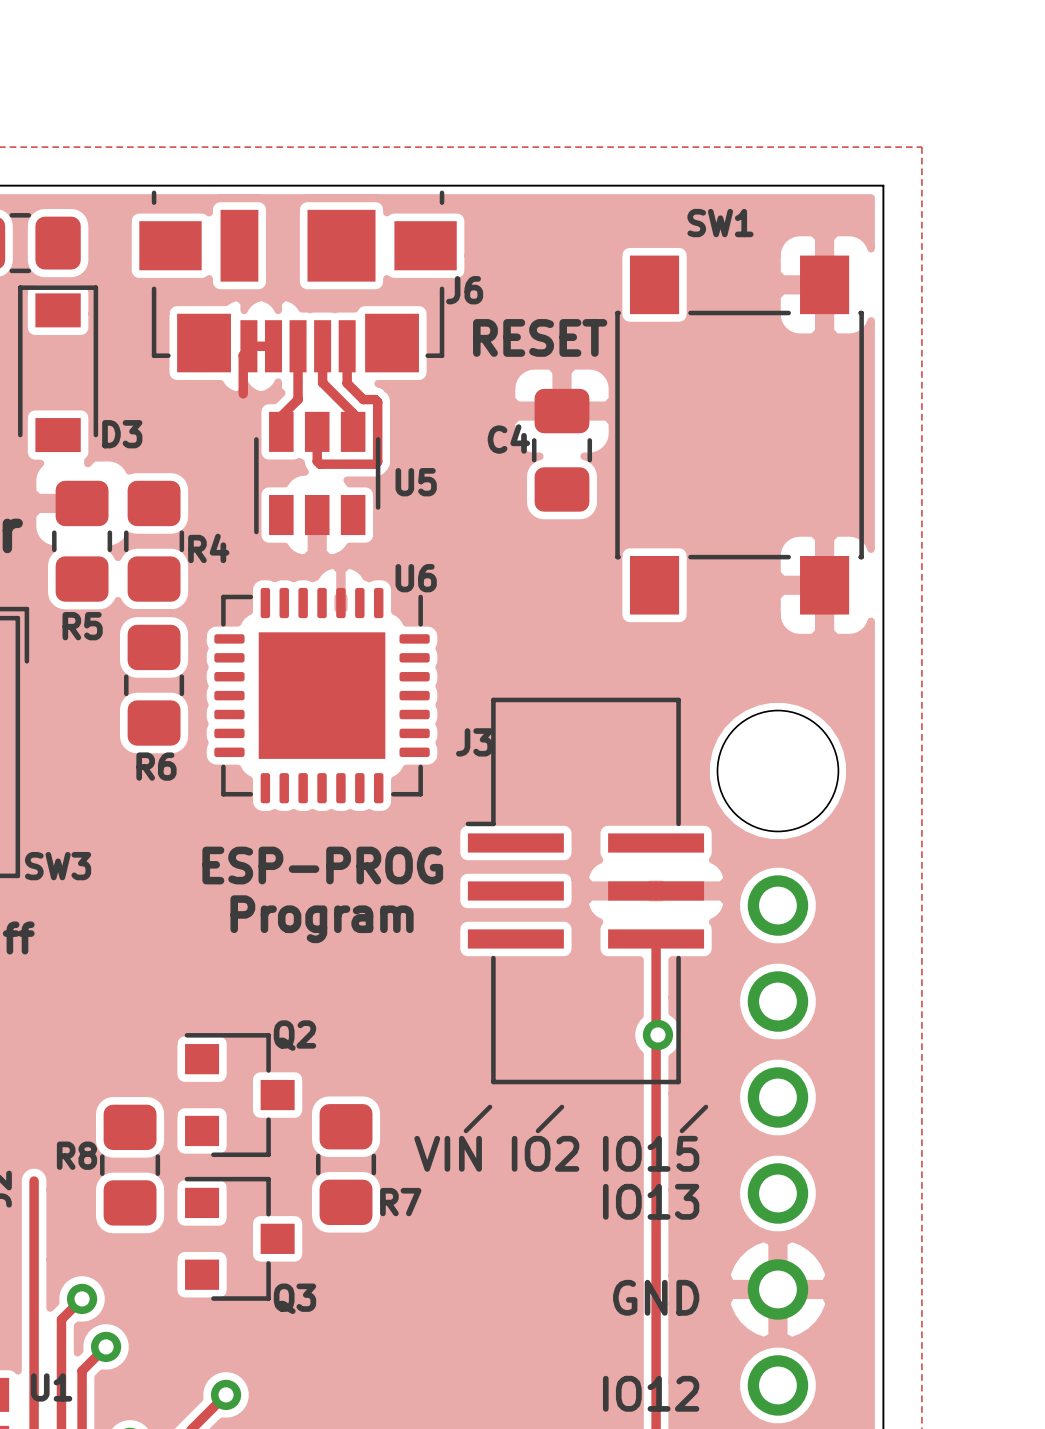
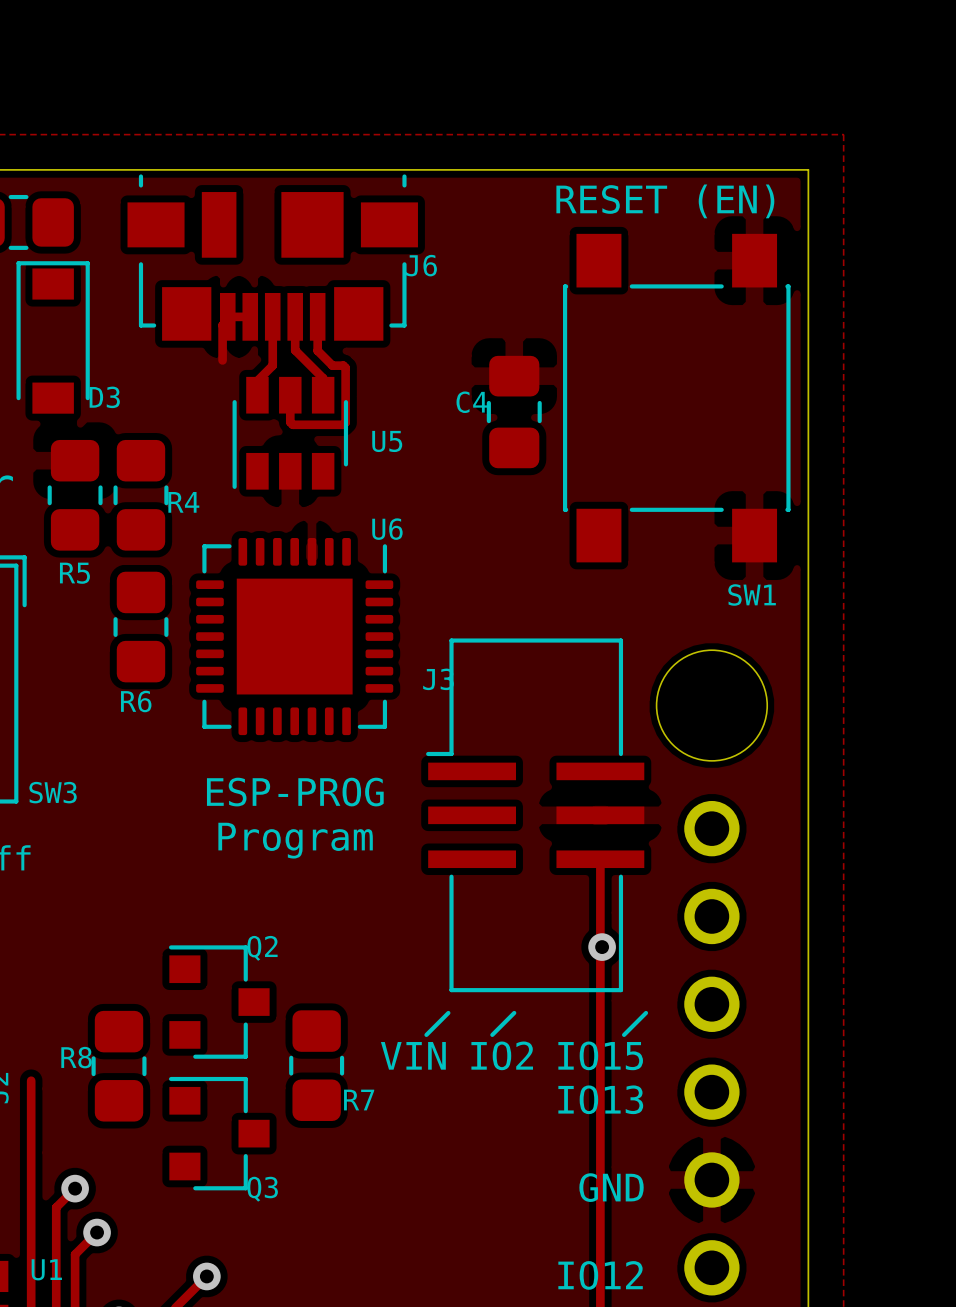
text: none -> RESET (EN) (665, 201)
SW1 name position: SW1 (720, 223) -> SW1 (752, 594)
text: RESET (540, 337) -> none

